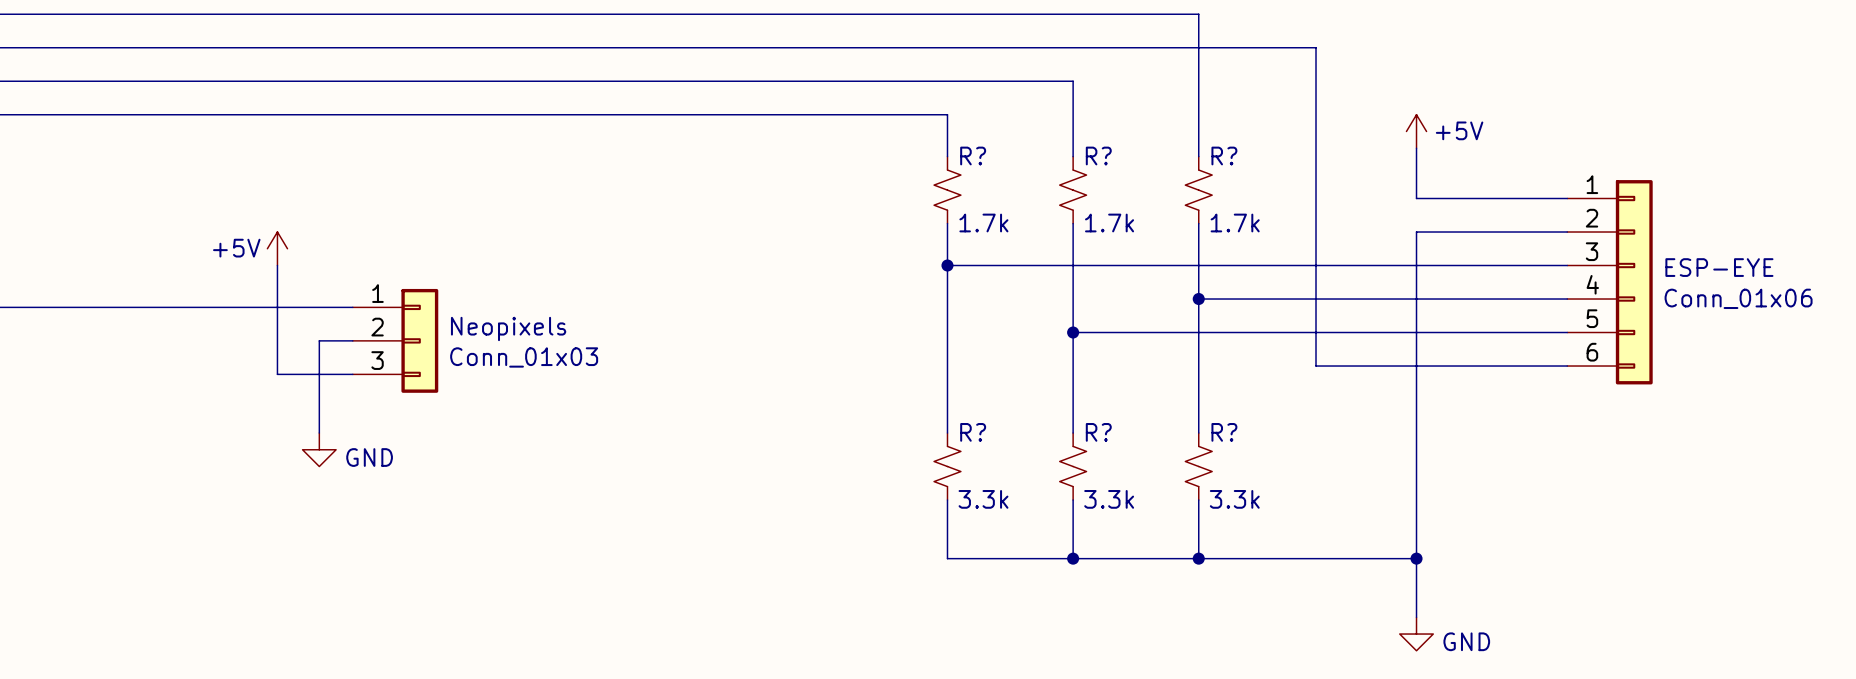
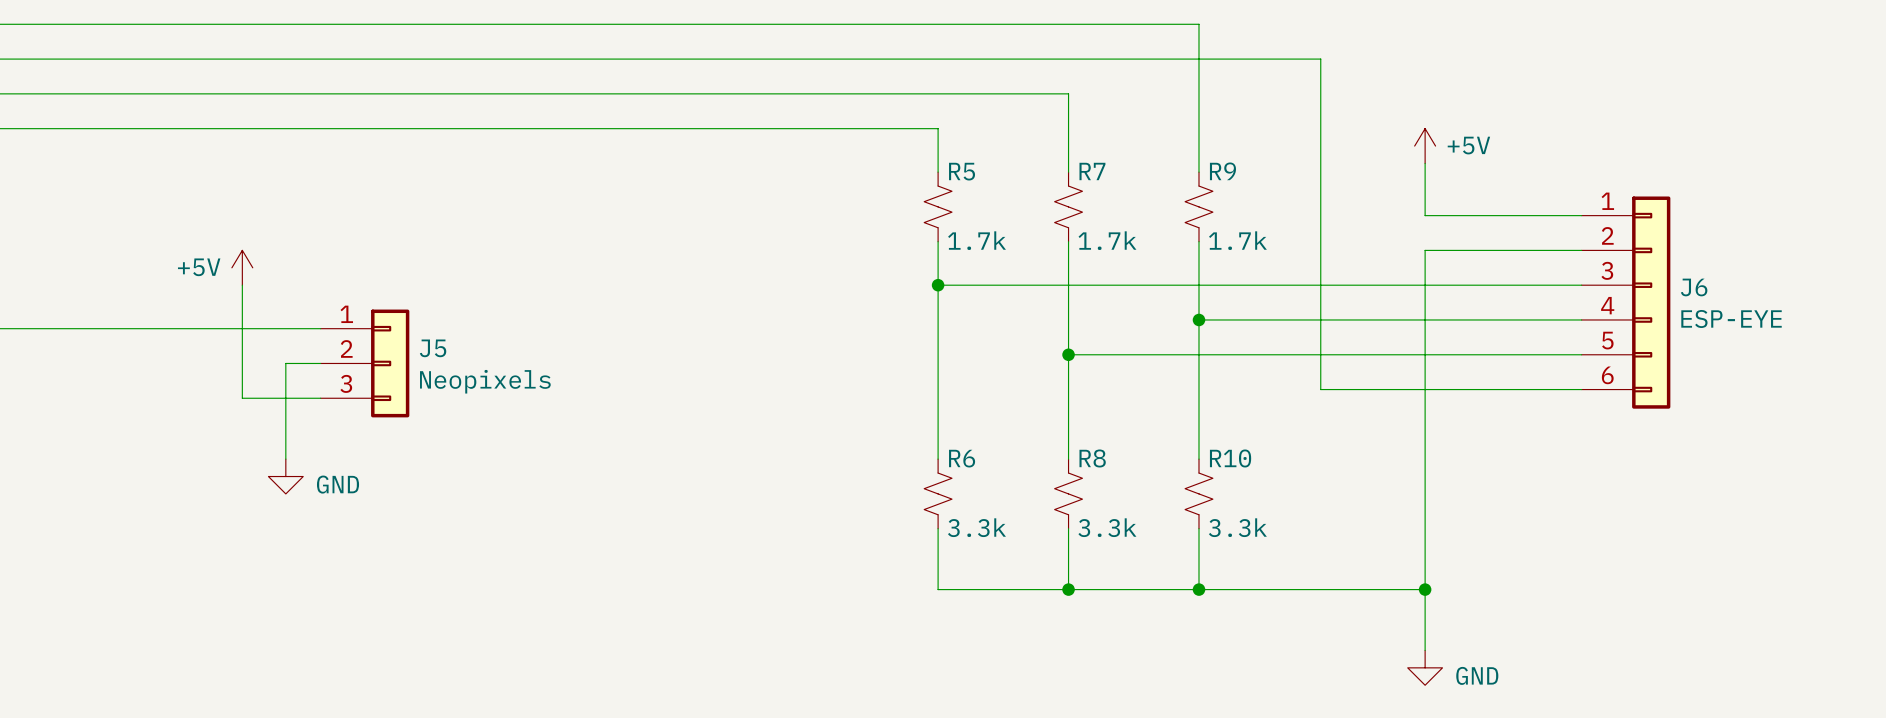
R? name: R? (973, 156) -> R5 (962, 171)
R? name: R? (1098, 156) -> R7 (1092, 171)
R? name: R? (1224, 156) -> R9 (1222, 171)
ESP-EYE name: ESP-EYE (1719, 267) -> J6 (1694, 287)
ESP-EYE value: Conn_01x06 (1738, 298) -> ESP-EYE (1731, 318)
Neopixels name: Neopixels (508, 328) -> J5 (433, 348)
Neopixels value: Conn_01x03 (524, 357) -> Neopixels (485, 381)
R? name: R? (973, 432) -> R6 (962, 458)
R? name: R? (1098, 432) -> R8 (1092, 458)
R? name: R? (1224, 432) -> R10 (1230, 458)

